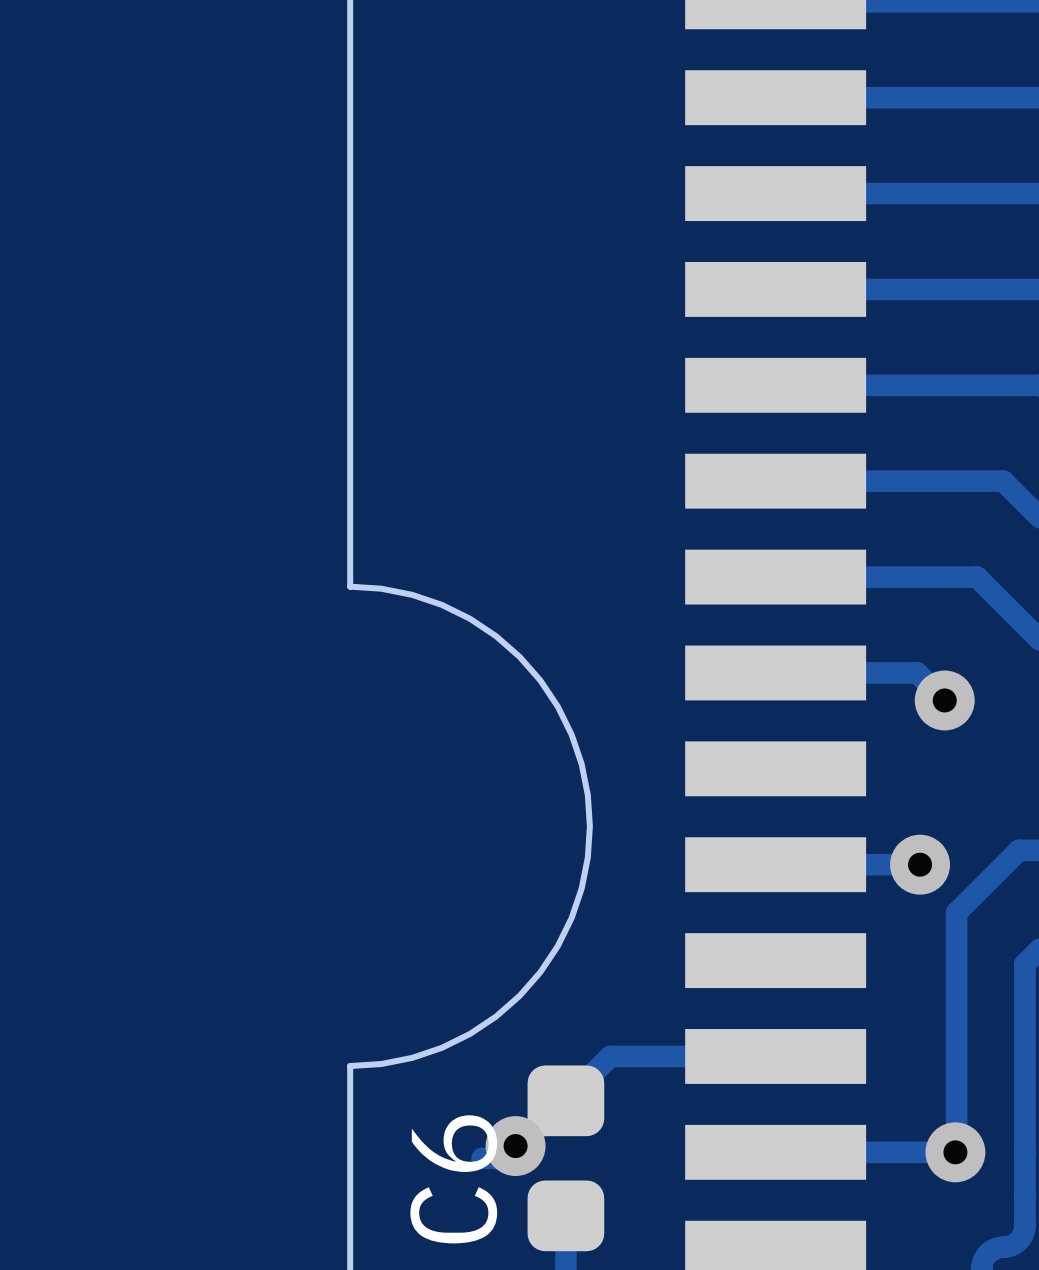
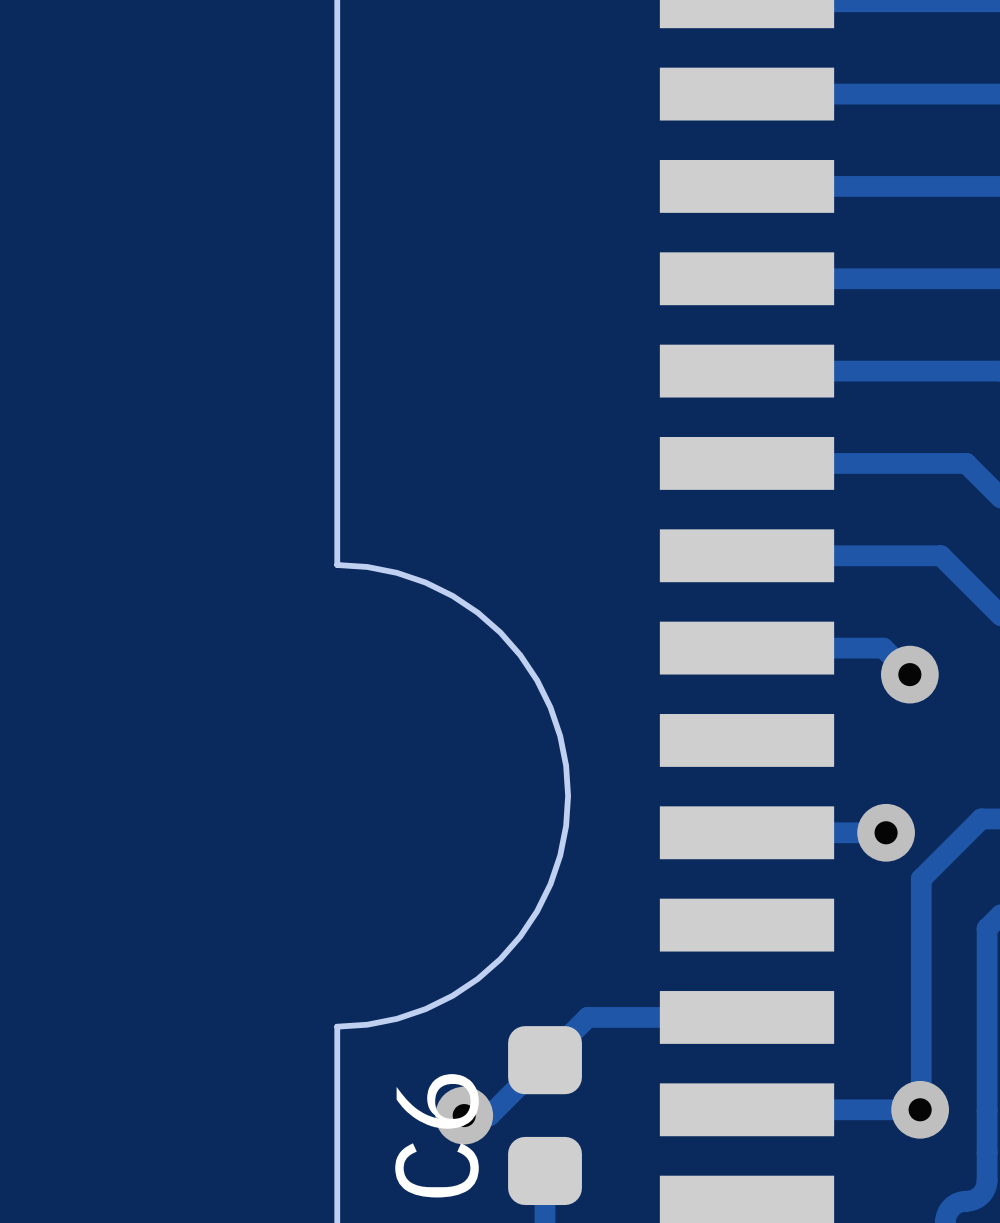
via position: (515, 1146) -> (464, 1115)

